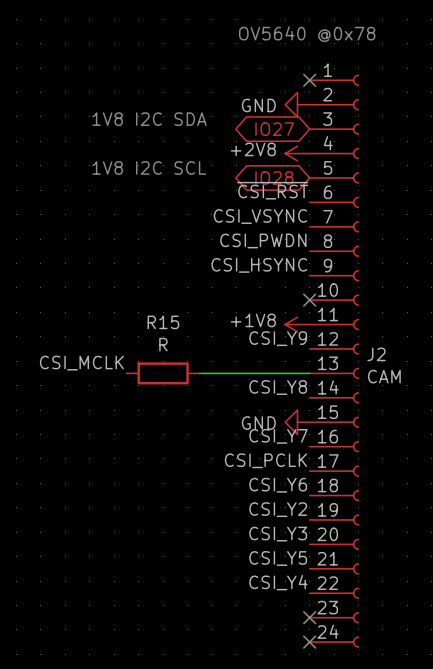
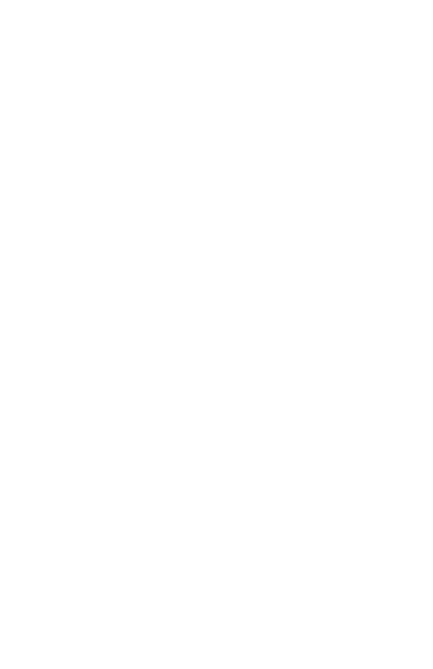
text: OV5640 @0x78 (307, 34) -> none
no-connect mark: (309, 80) -> none
power symbol: GND (297, 104) -> none
text: 1V8 I2C SDA (149, 119) -> none
global label: IO27 (274, 129) -> none
power symbol: +2V8 (297, 153) -> none
text: 1V8 I2C SCL (149, 167) -> none
global label: IO28 (274, 177) -> none
label: ~{CSI_RST} (272, 190) -> none
label: CSI_VSYNC (260, 216) -> none
label: CSI_PWDN (263, 240) -> none
label: CSI_HSYNC (259, 265) -> none
no-connect mark: (309, 300) -> none
power symbol: +1V8 (297, 324) -> none
label: CSI_Y9 (278, 338) -> none
J2: CAM (334, 361) -> none
label: CSI_MCLK (81, 363) -> none
R15: R (163, 373) -> none
wire: (199, 373) (309, 373) -> none
label: CSI_Y8 (278, 387) -> none
power symbol: GND (297, 422) -> none
label: CSI_Y7 (278, 436) -> none
label: CSI_PCLK (265, 460) -> none
label: CSI_Y6 (278, 485) -> none
label: CSI_Y2 (278, 509) -> none
label: CSI_Y3 (278, 534) -> none
label: CSI_Y5 (278, 558) -> none
label: CSI_Y4 (278, 582) -> none
no-connect mark: (309, 617) -> none
no-connect mark: (309, 642) -> none

